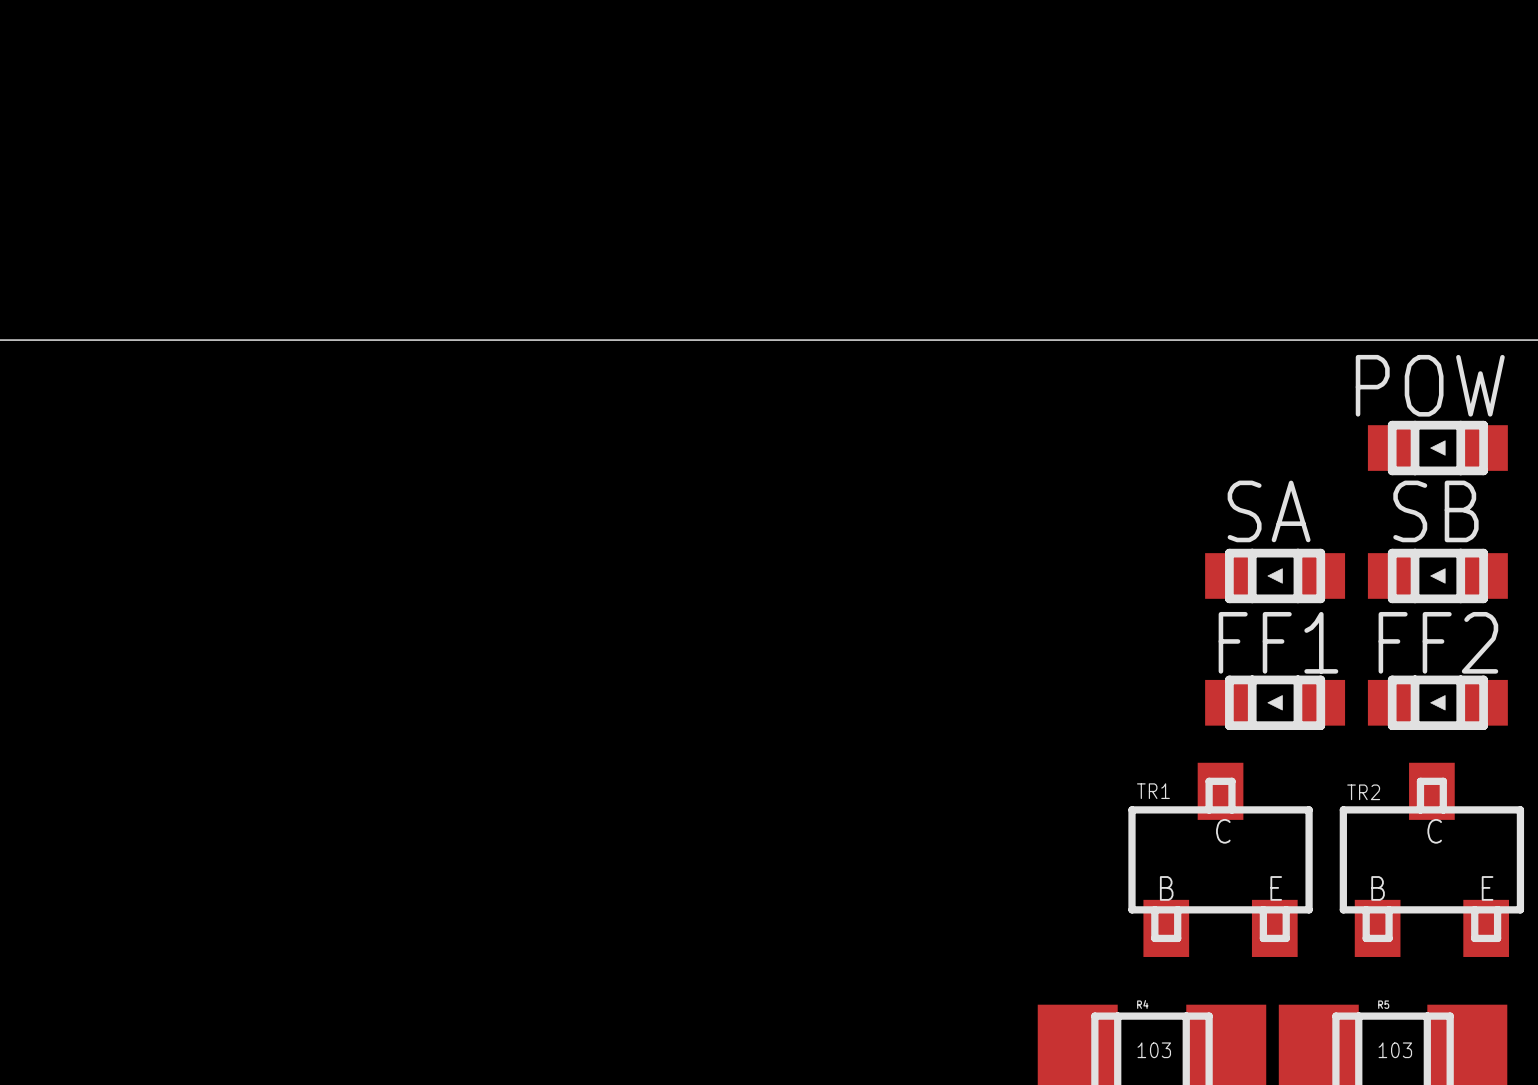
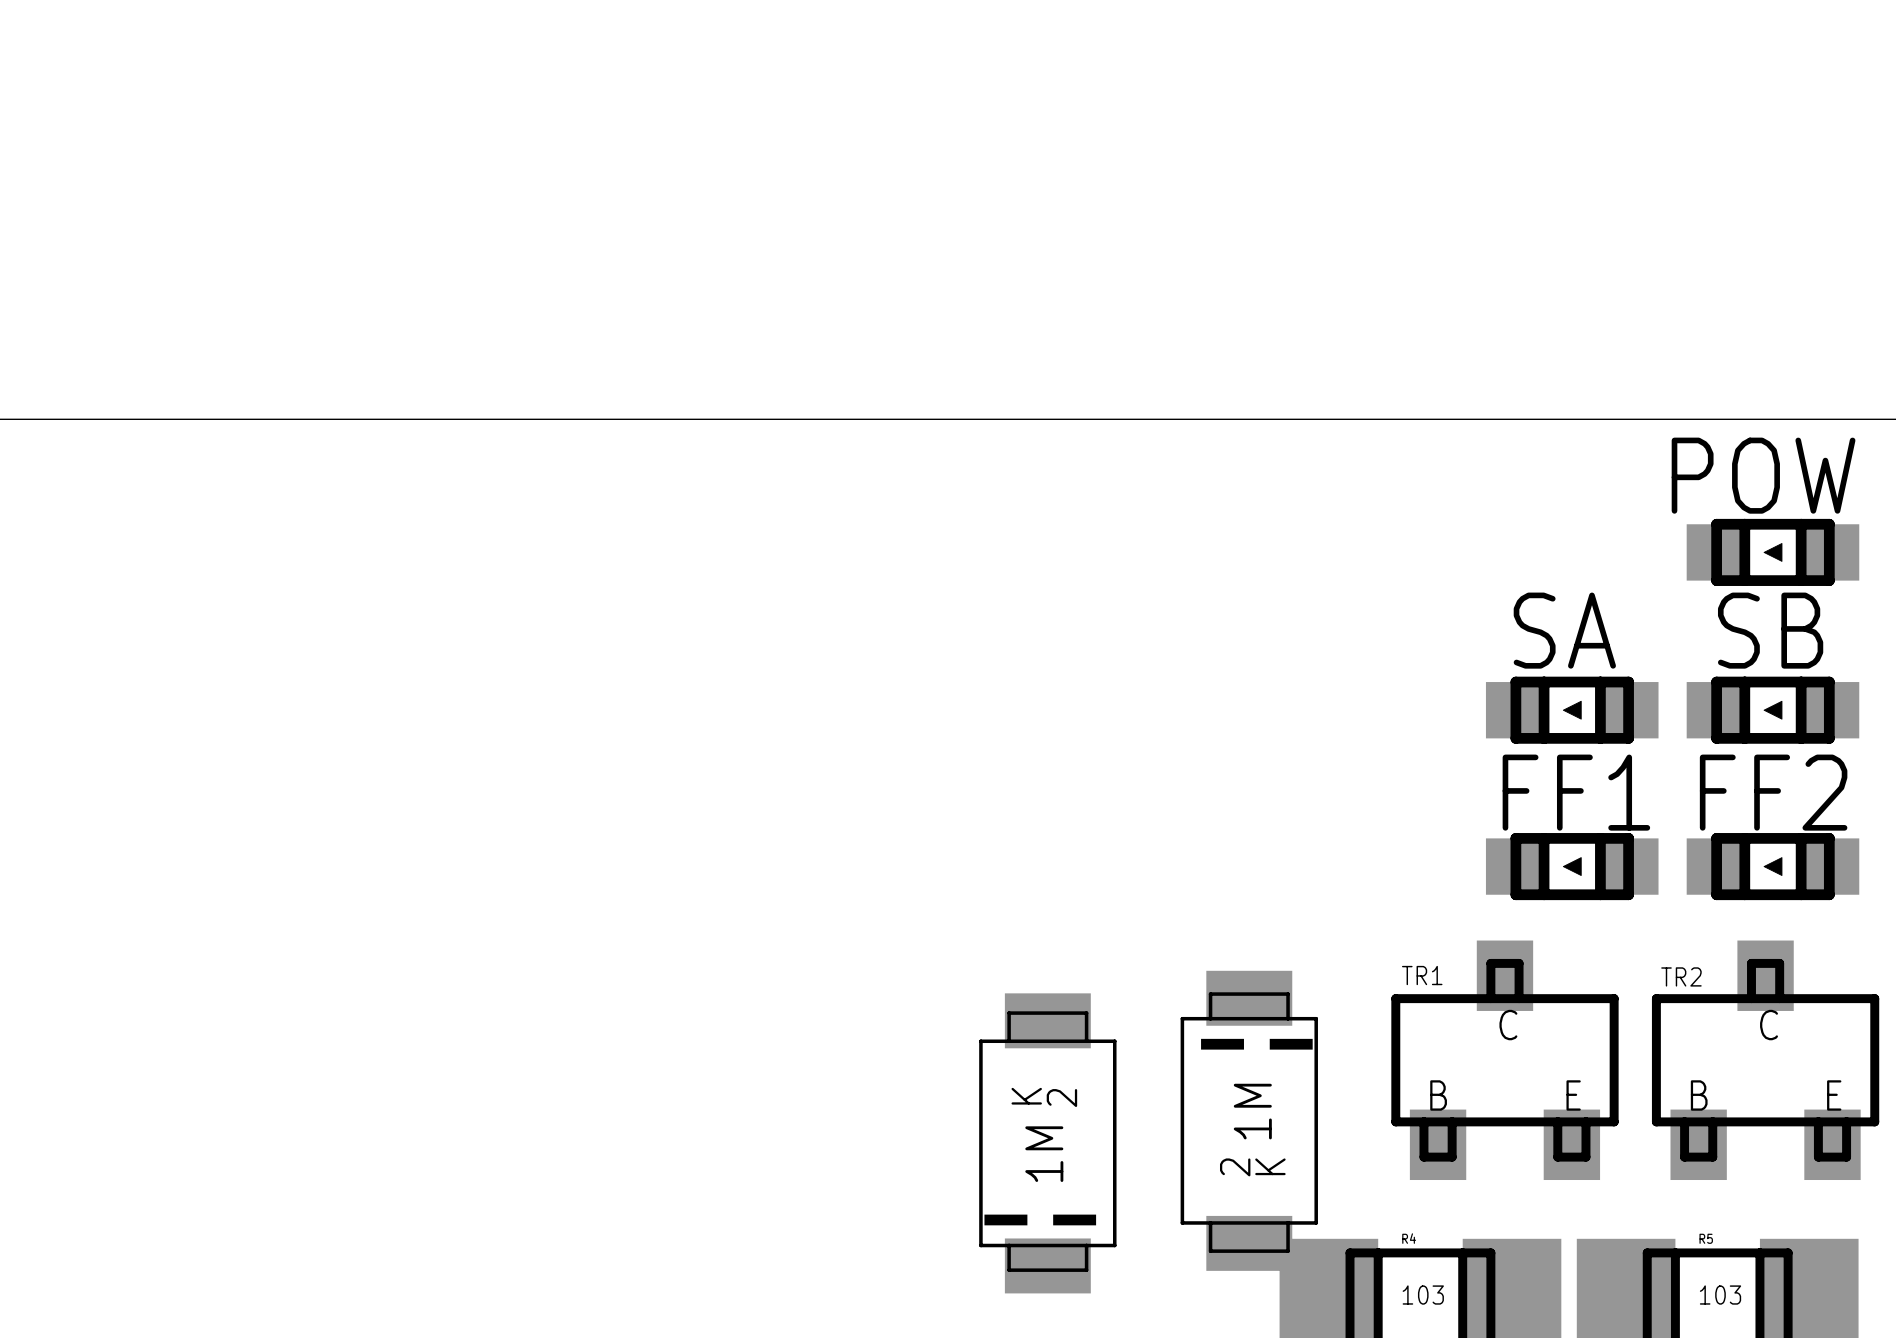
part: none -> (1249, 1120)
part: none -> (1047, 1143)

